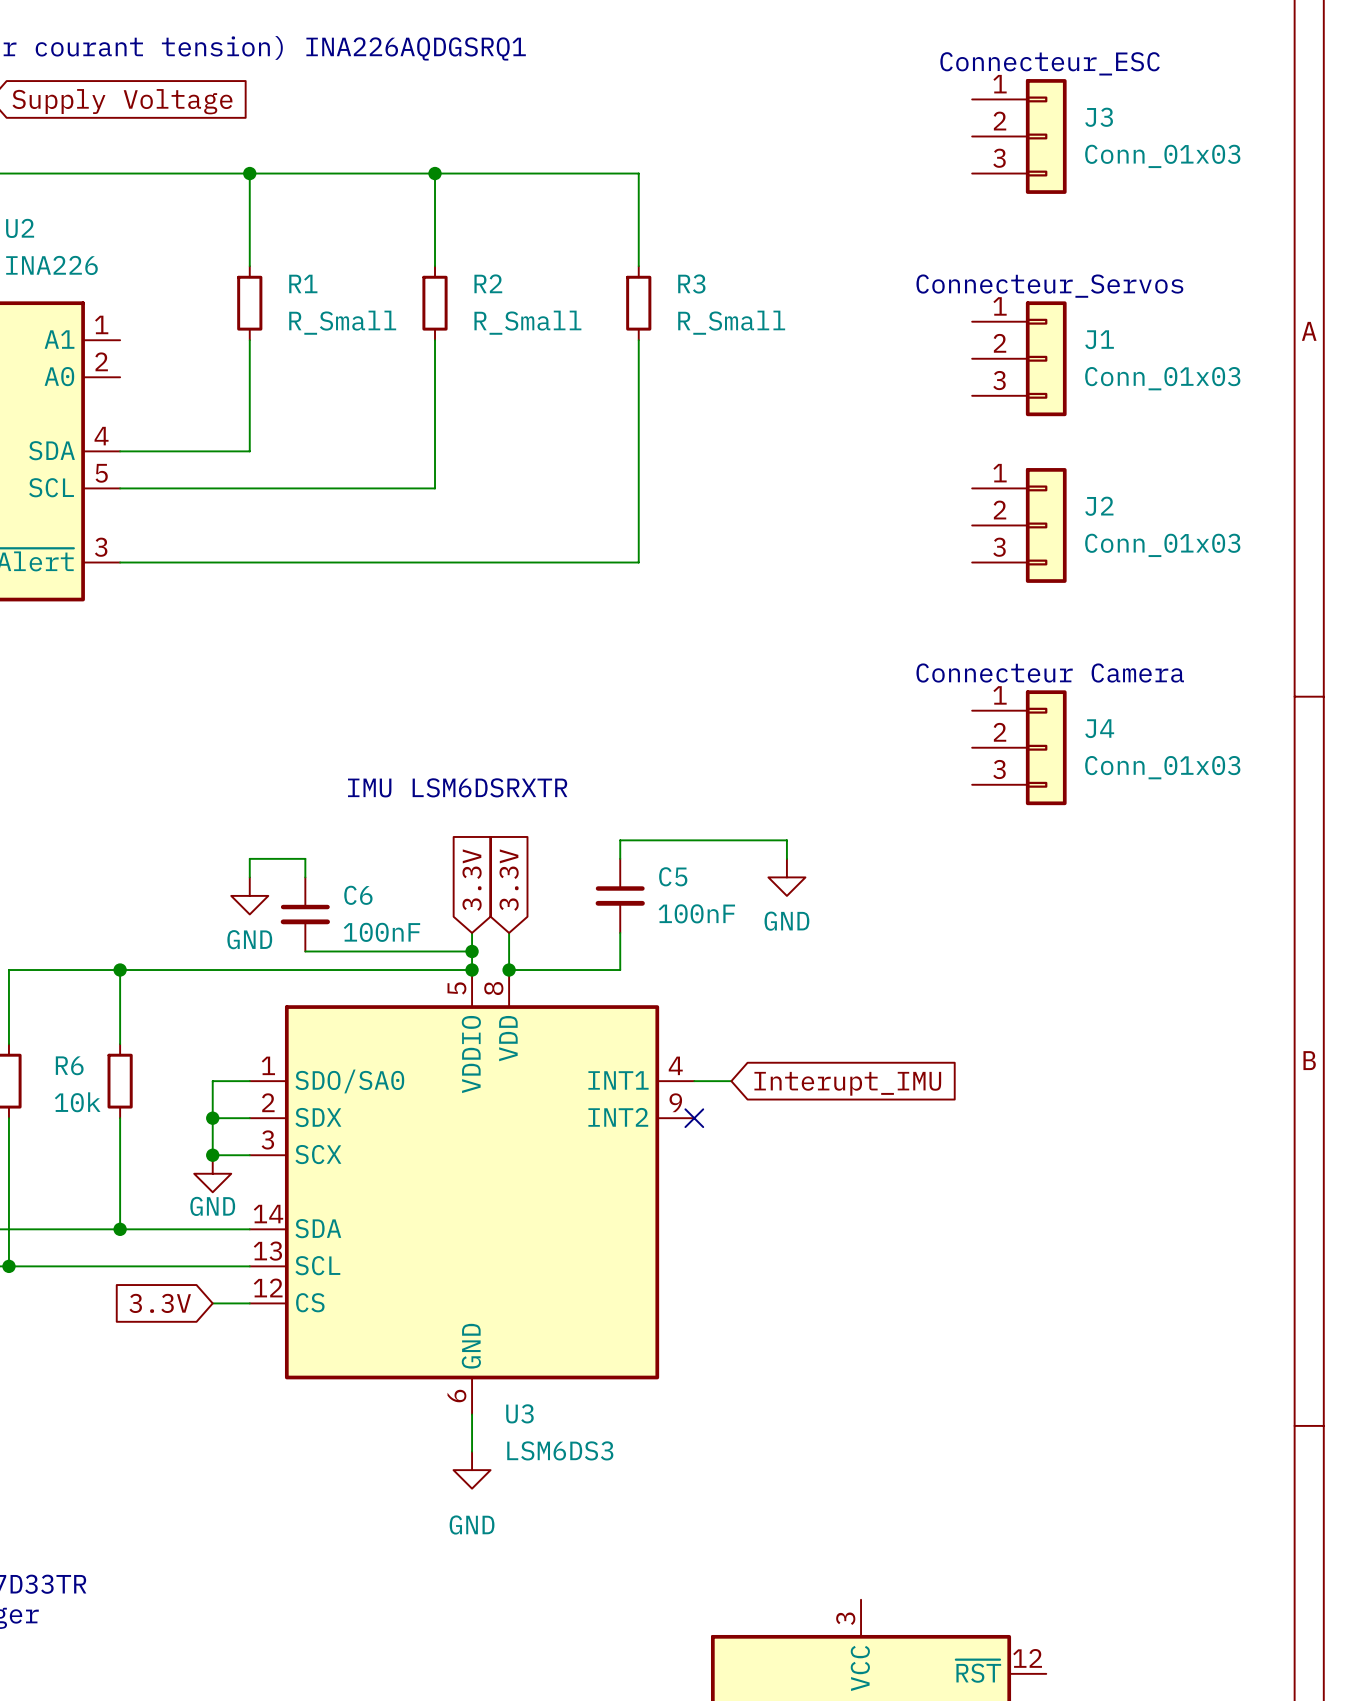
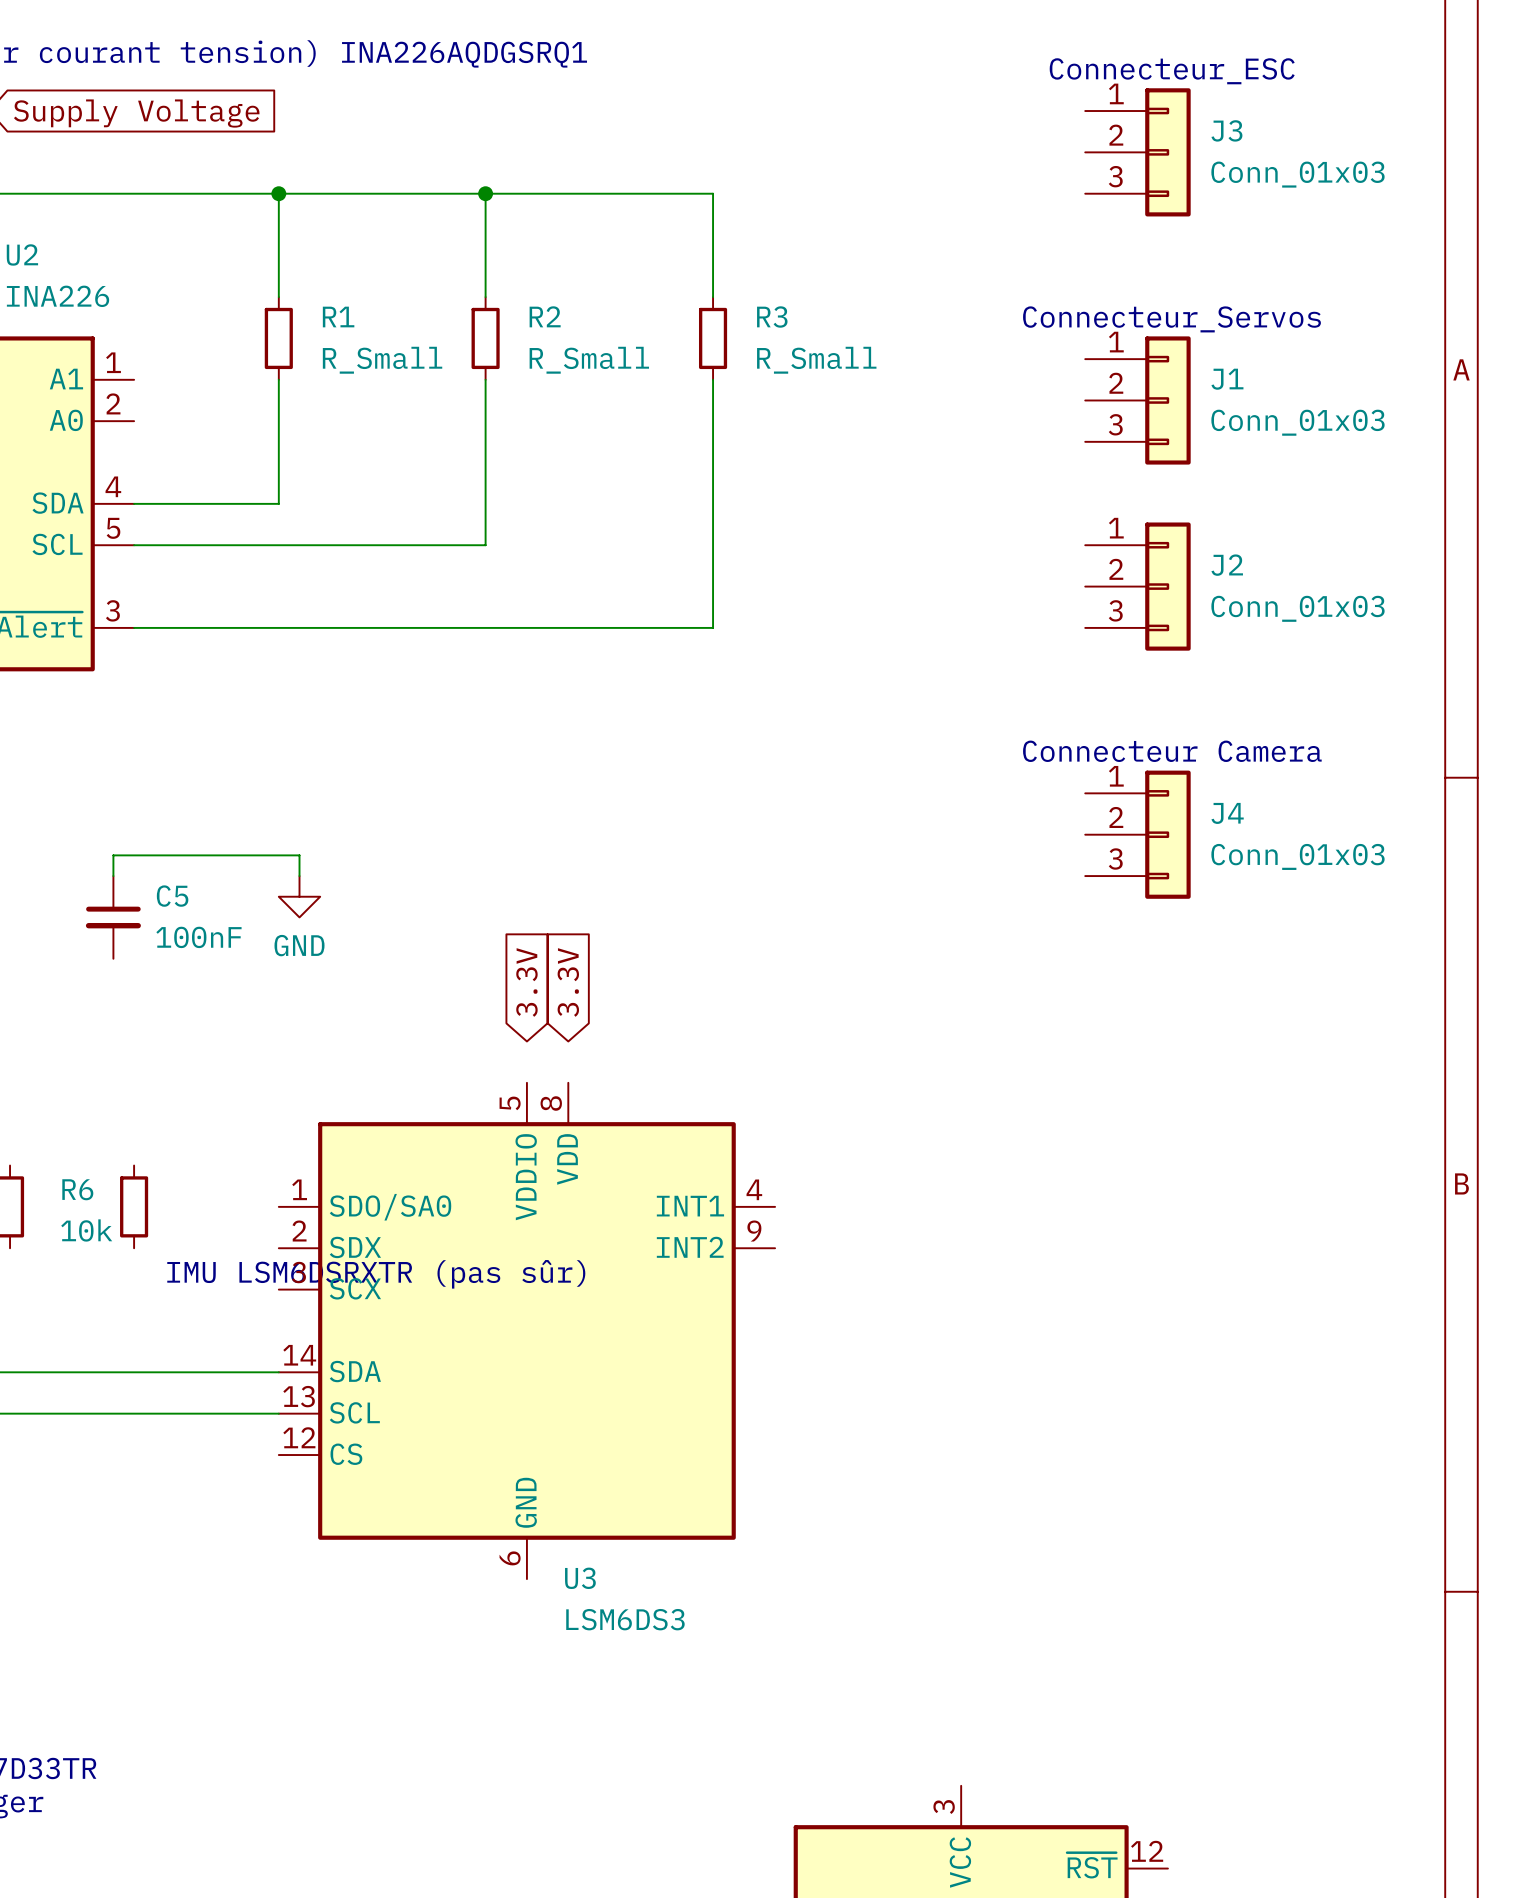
wire: none -> (113, 876) (113, 855) (299, 855) (299, 876)
text: IMU LSM6DSRXTR (457, 787) -> none
wire: (620, 858) (620, 840) (786, 840) (786, 858) -> none
wire: (249, 877) (249, 858) (305, 858) (305, 877) -> none
power symbol: GND (786, 877) -> none
power symbol position: GND (249, 895) -> GND (299, 896)
C5 position: (620, 895) -> (113, 917)
C6: 100nF (305, 914) -> none
wire: (472, 932) (472, 970) (8, 970) (8, 1044) -> none
wire: (509, 932) (509, 970) (620, 970) (620, 932) -> none
wire: (305, 951) (472, 951) -> none
junction: (472, 951) -> none
wire: (120, 970) (120, 1044) -> none
junction: (120, 970) -> none
junction: (472, 970) -> none
junction: (509, 970) -> none
wire: (249, 1081) (212, 1081) (212, 1155) (249, 1155) -> none
wire: (694, 1081) (731, 1081) -> none
global label: Interupt_IMU (847, 1083) -> none
wire: (8, 1118) (8, 1266) -> none
wire: (120, 1118) (120, 1229) -> none
wire: (212, 1118) (249, 1118) -> none
junction: (212, 1118) -> none
no-connect mark: (694, 1118) -> none
text: none -> IMU LSM6DSRXTR (pas sûr) (376, 1274)
junction: (212, 1155) -> none
power symbol: GND (212, 1173) -> none
junction: (120, 1229) -> none
junction: (8, 1266) -> none
global label: 3.3V (160, 1303) -> none
wire: (212, 1303) (249, 1303) -> none
wire: (472, 1414) (472, 1451) -> none
power symbol: GND (472, 1470) -> none

